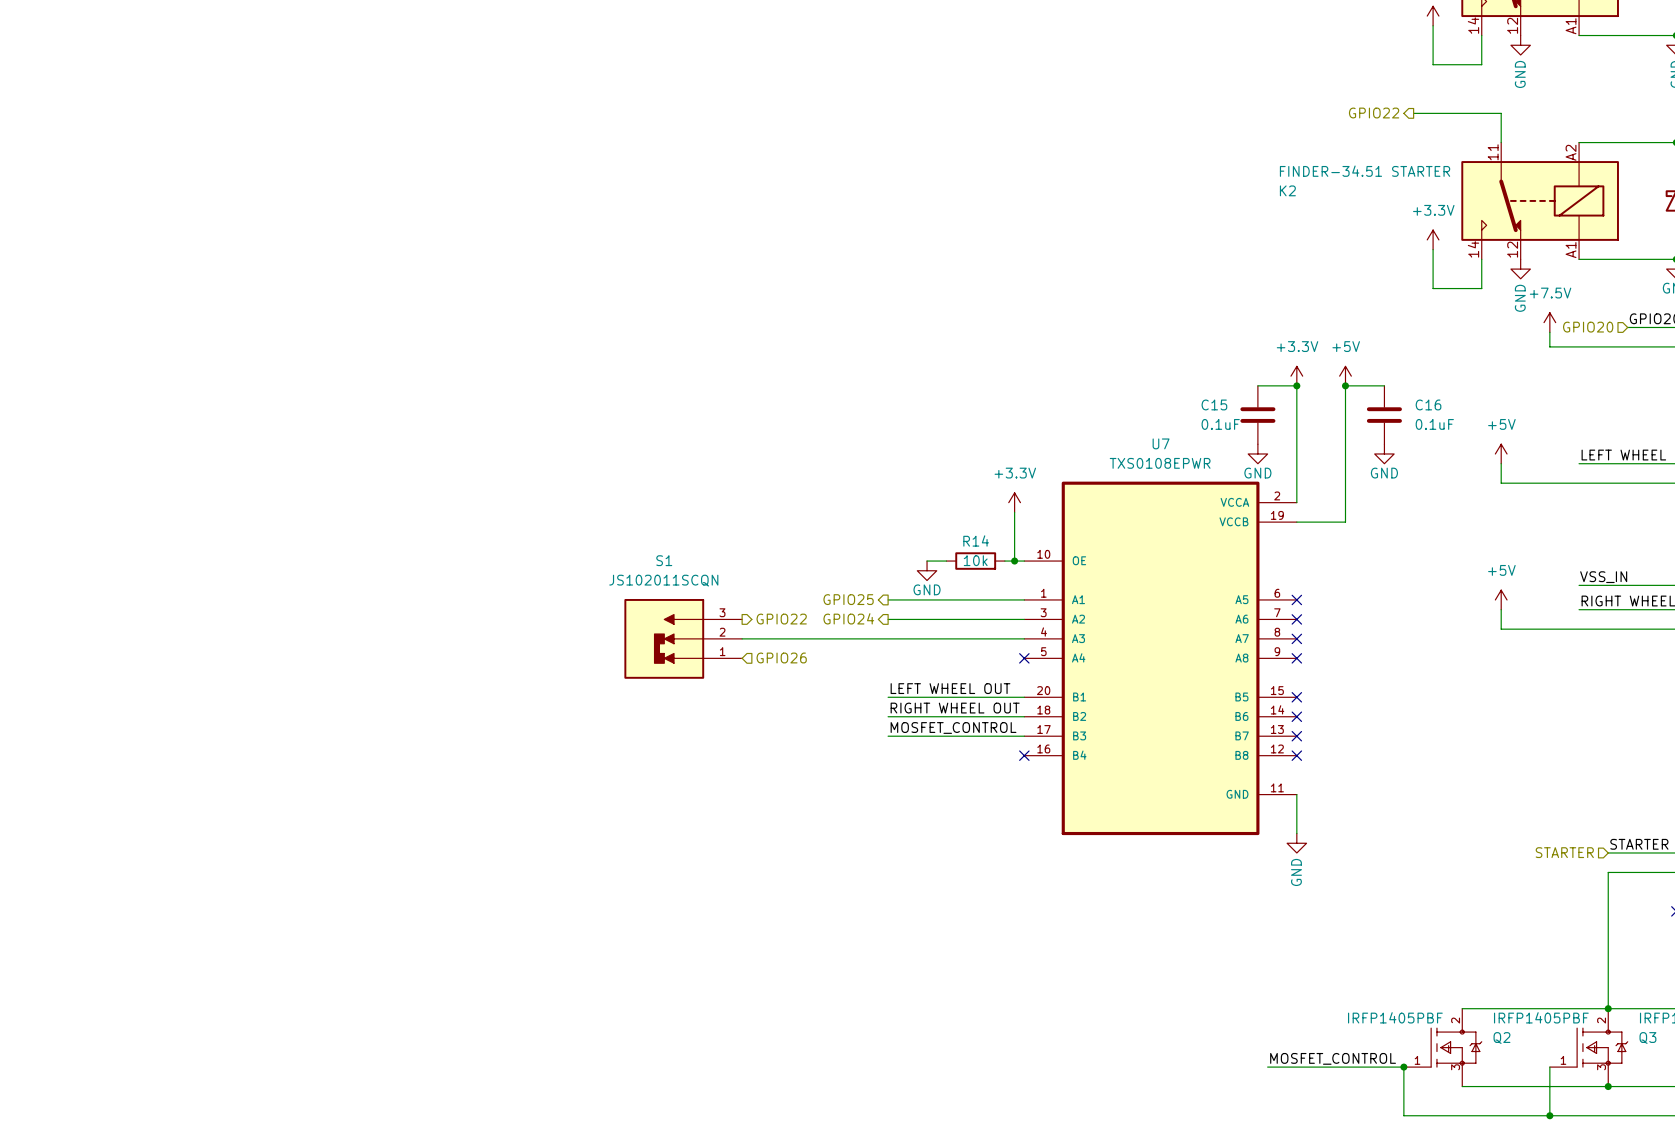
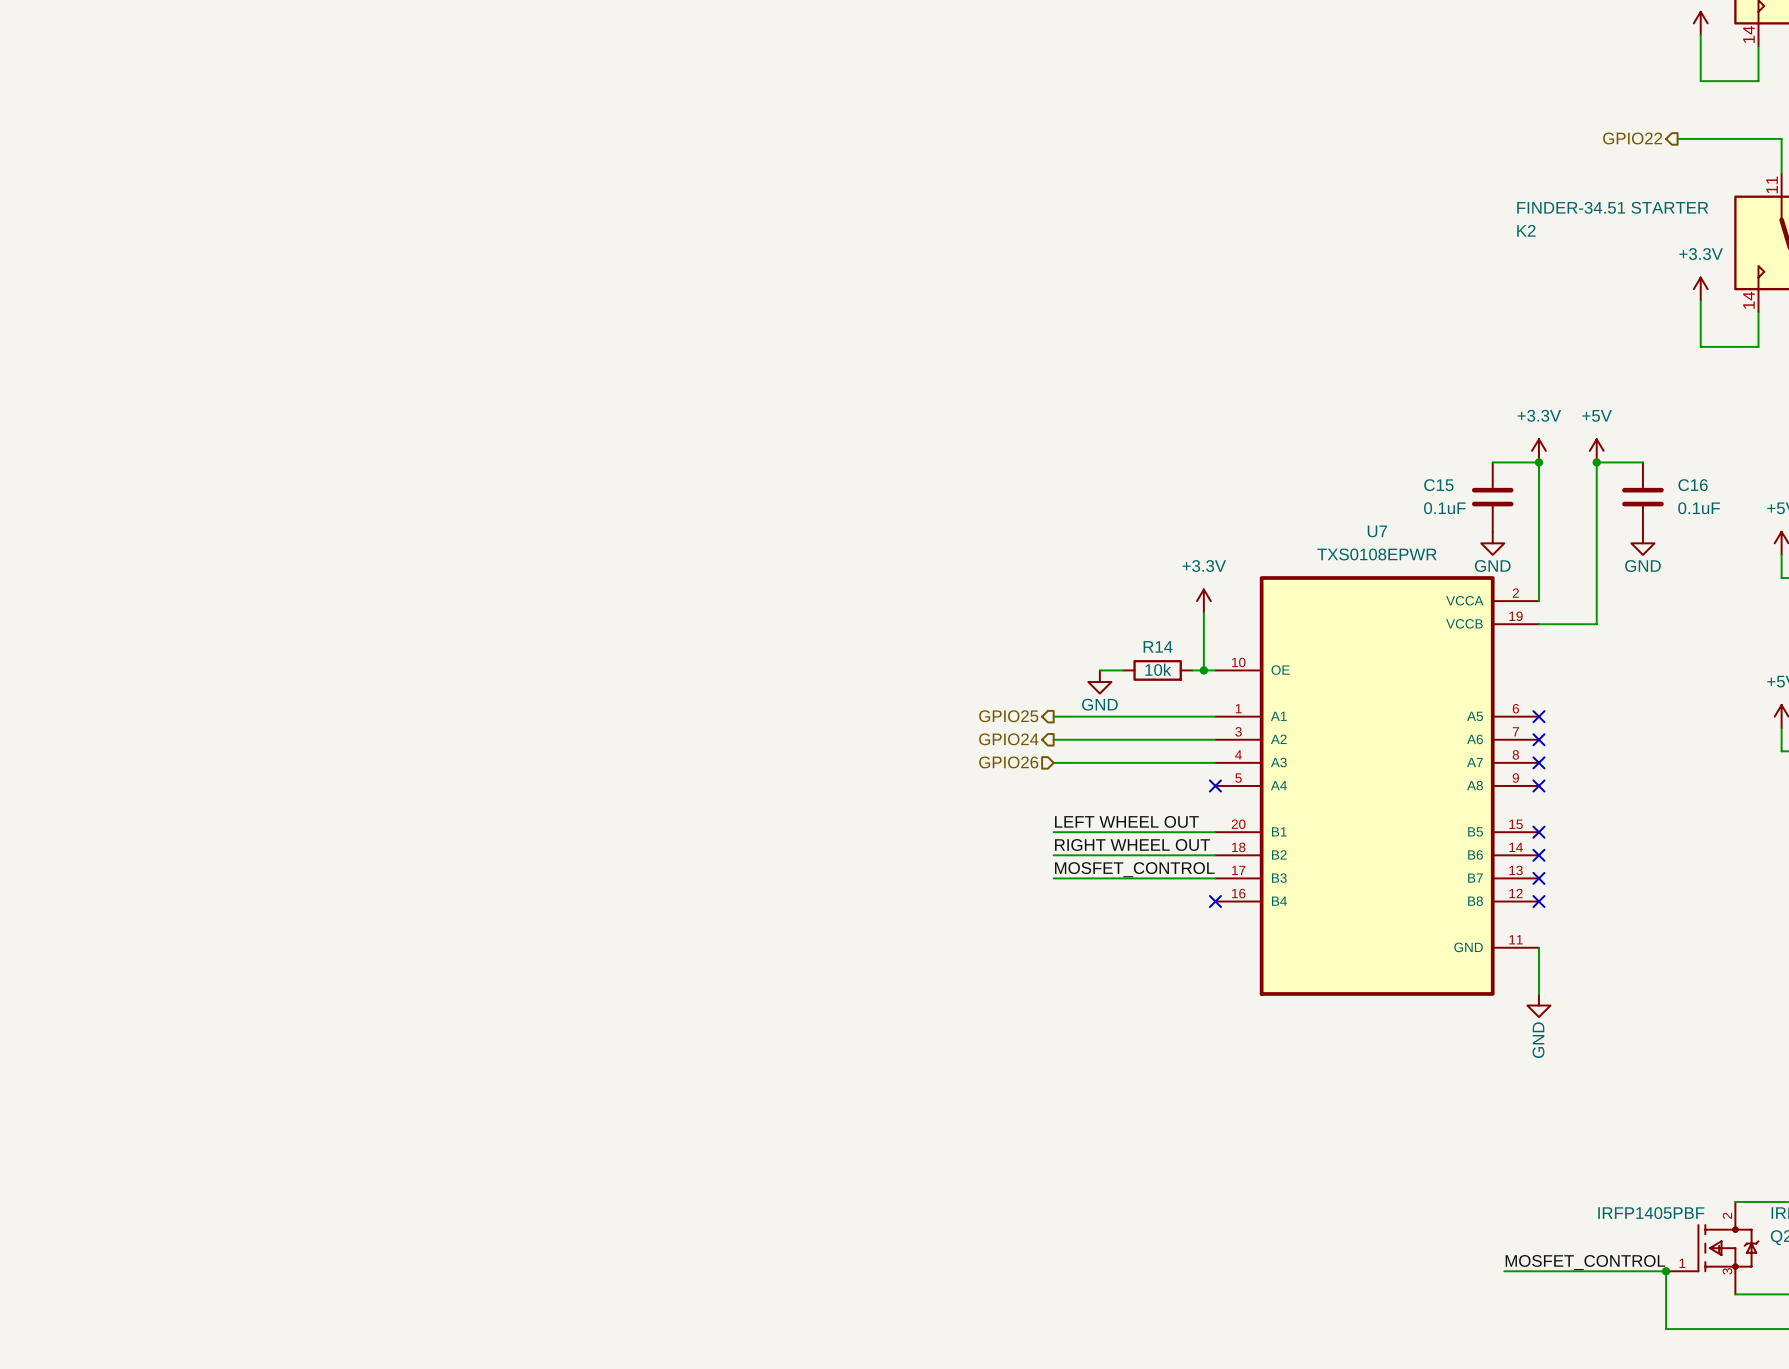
hierarchical label: GPIO22 (781, 619) -> none
S1: JS102011SCQN (683, 638) -> none
wire: (742, 638) (888, 638) -> none
hierarchical label rotation: 0° (781, 657) -> 180° (1008, 762)

